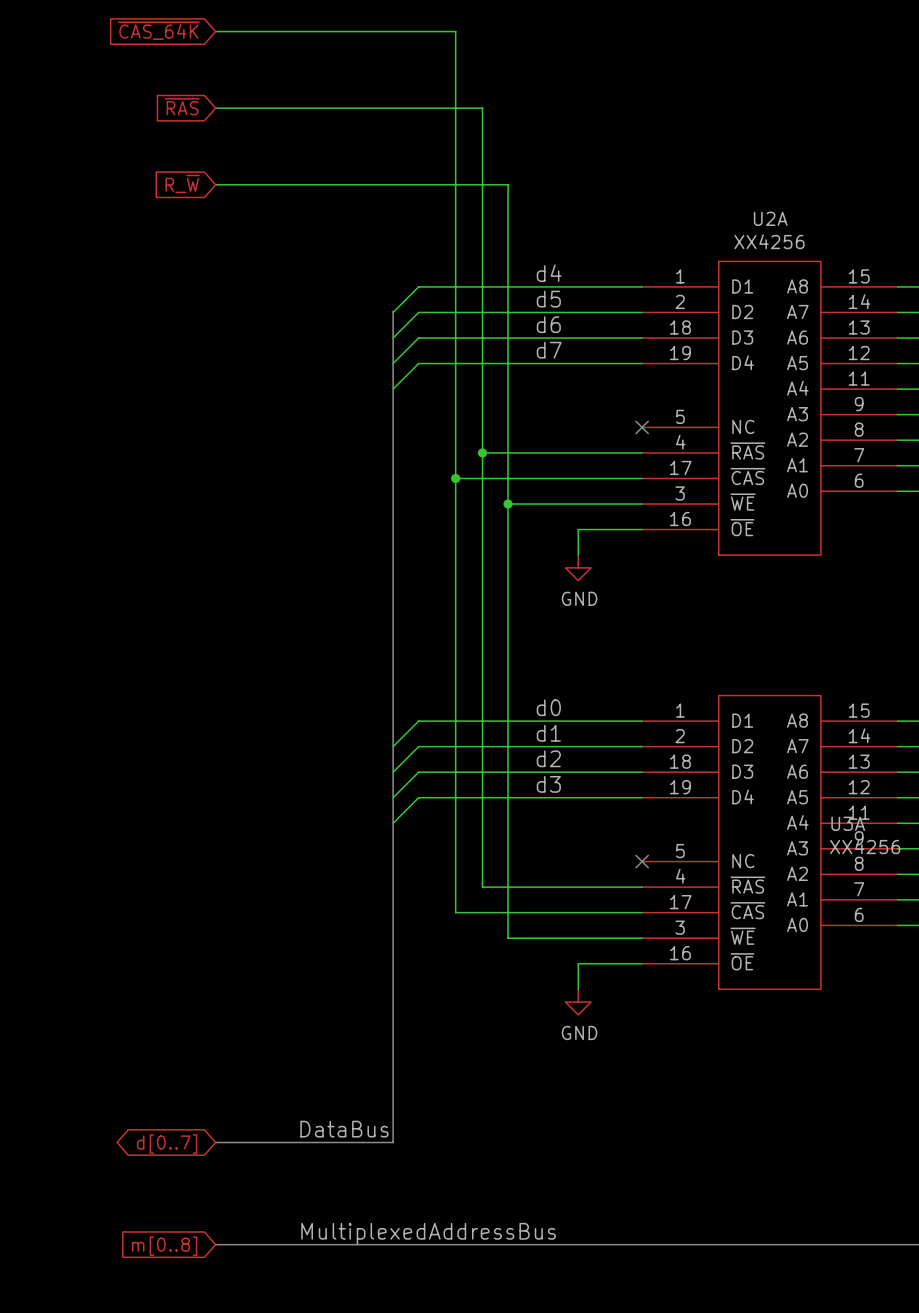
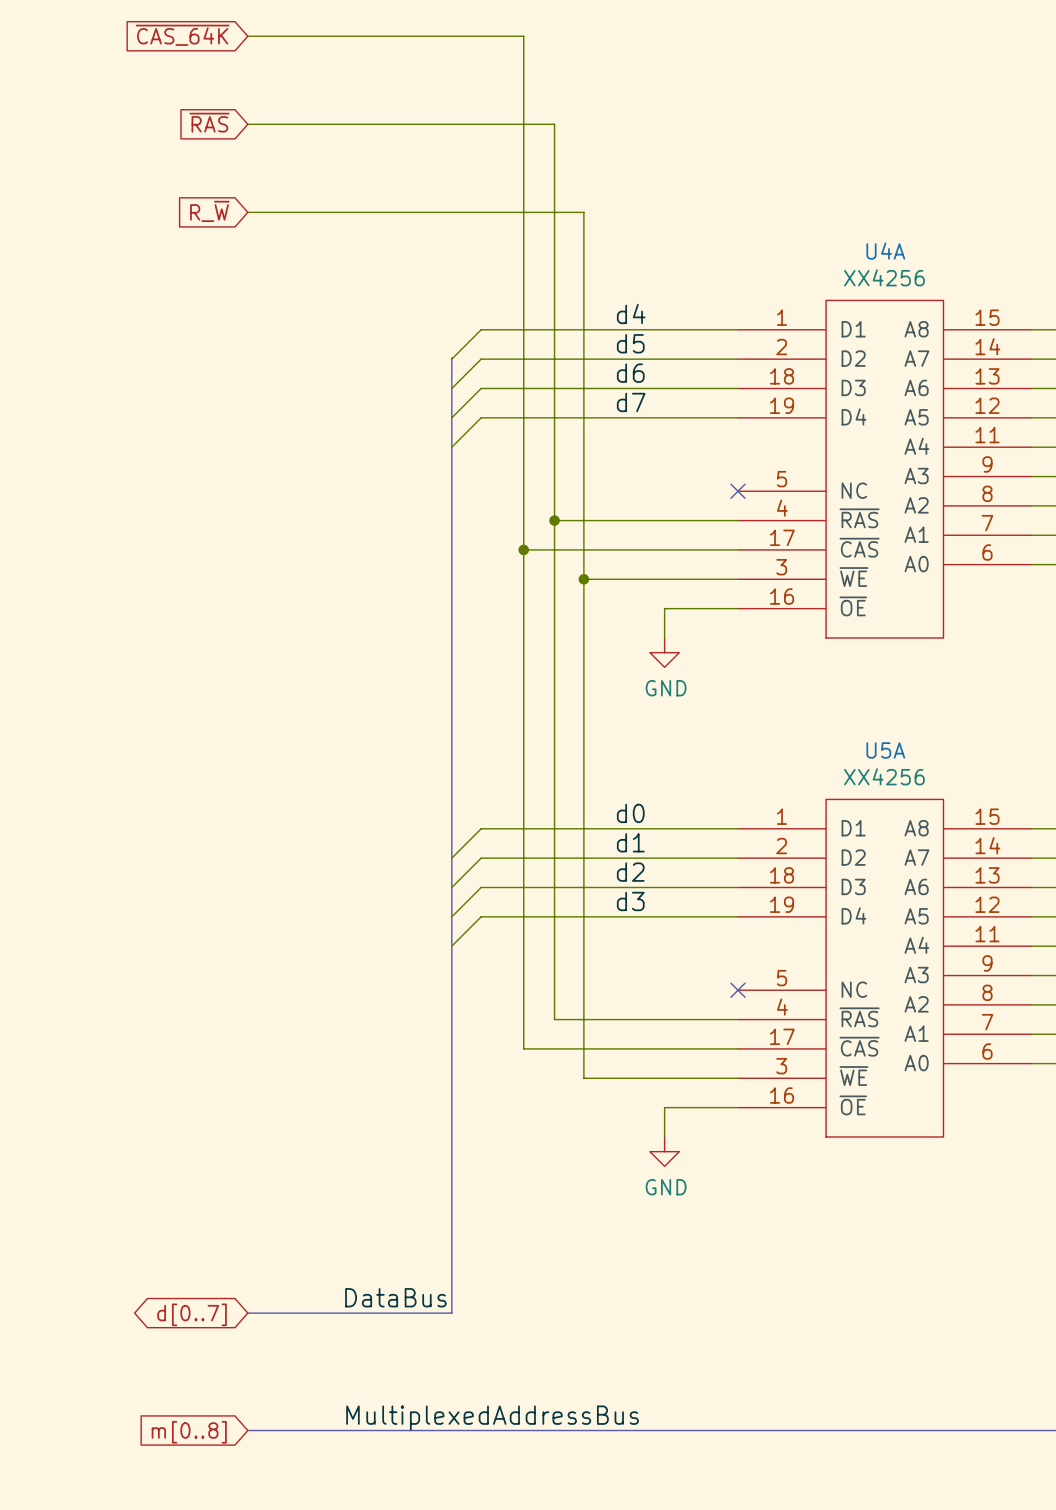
U2A name: U2A (770, 218) -> U4A (885, 251)
U3A name: U3A (848, 823) -> U5A (885, 750)
U3A value position: XX4256 (865, 846) -> XX4256 (884, 776)

